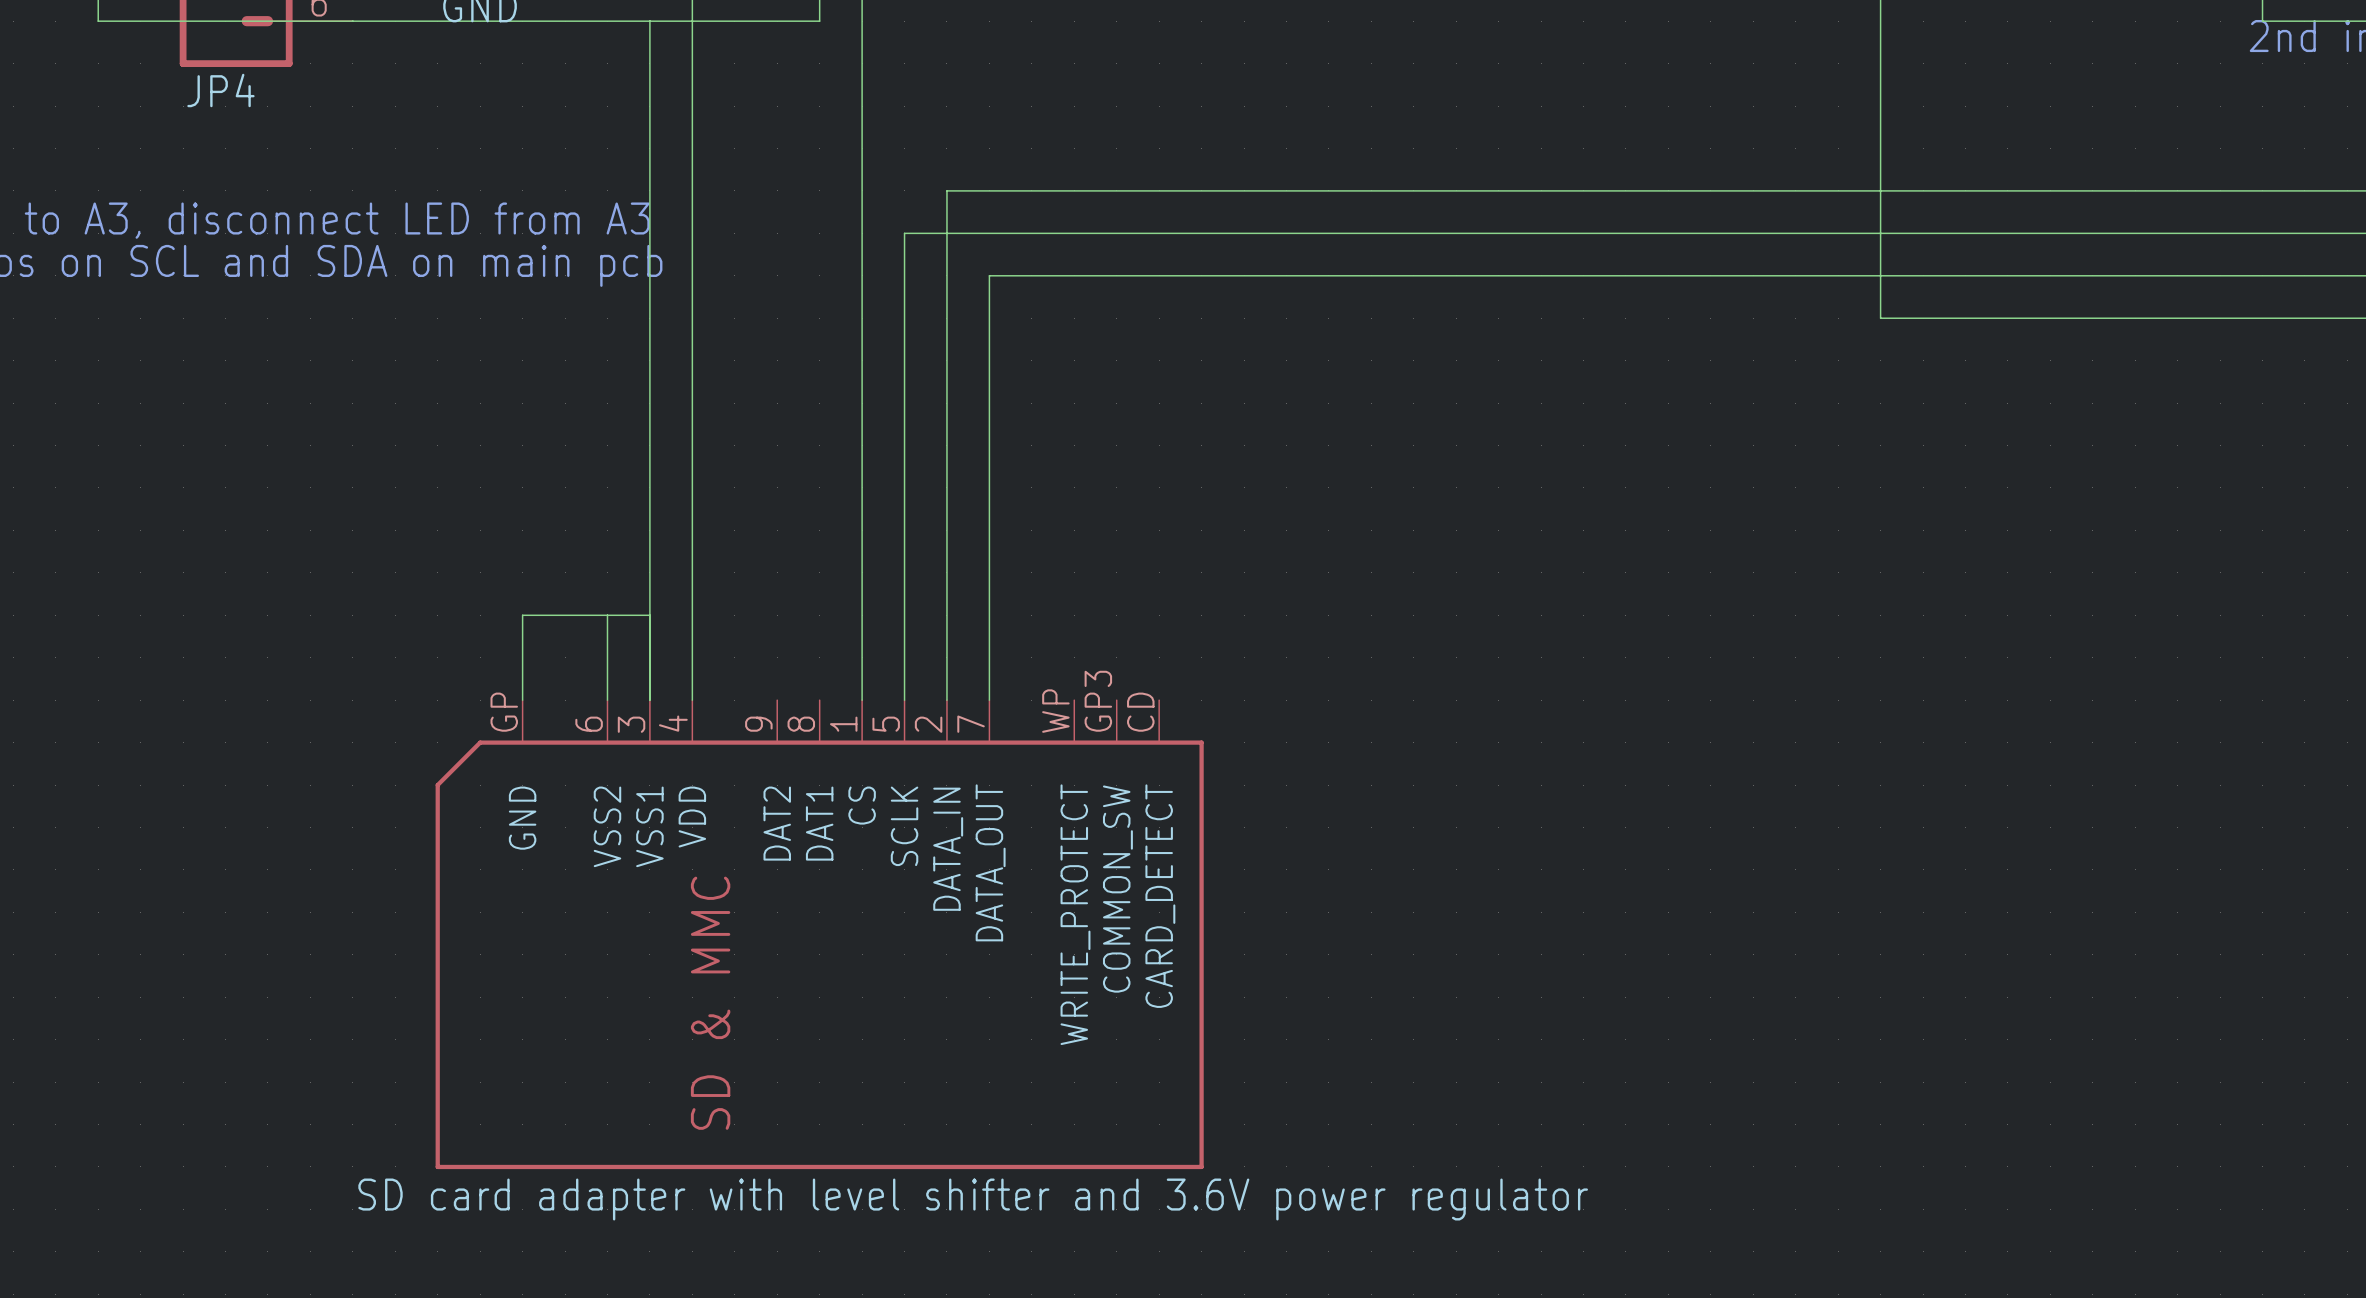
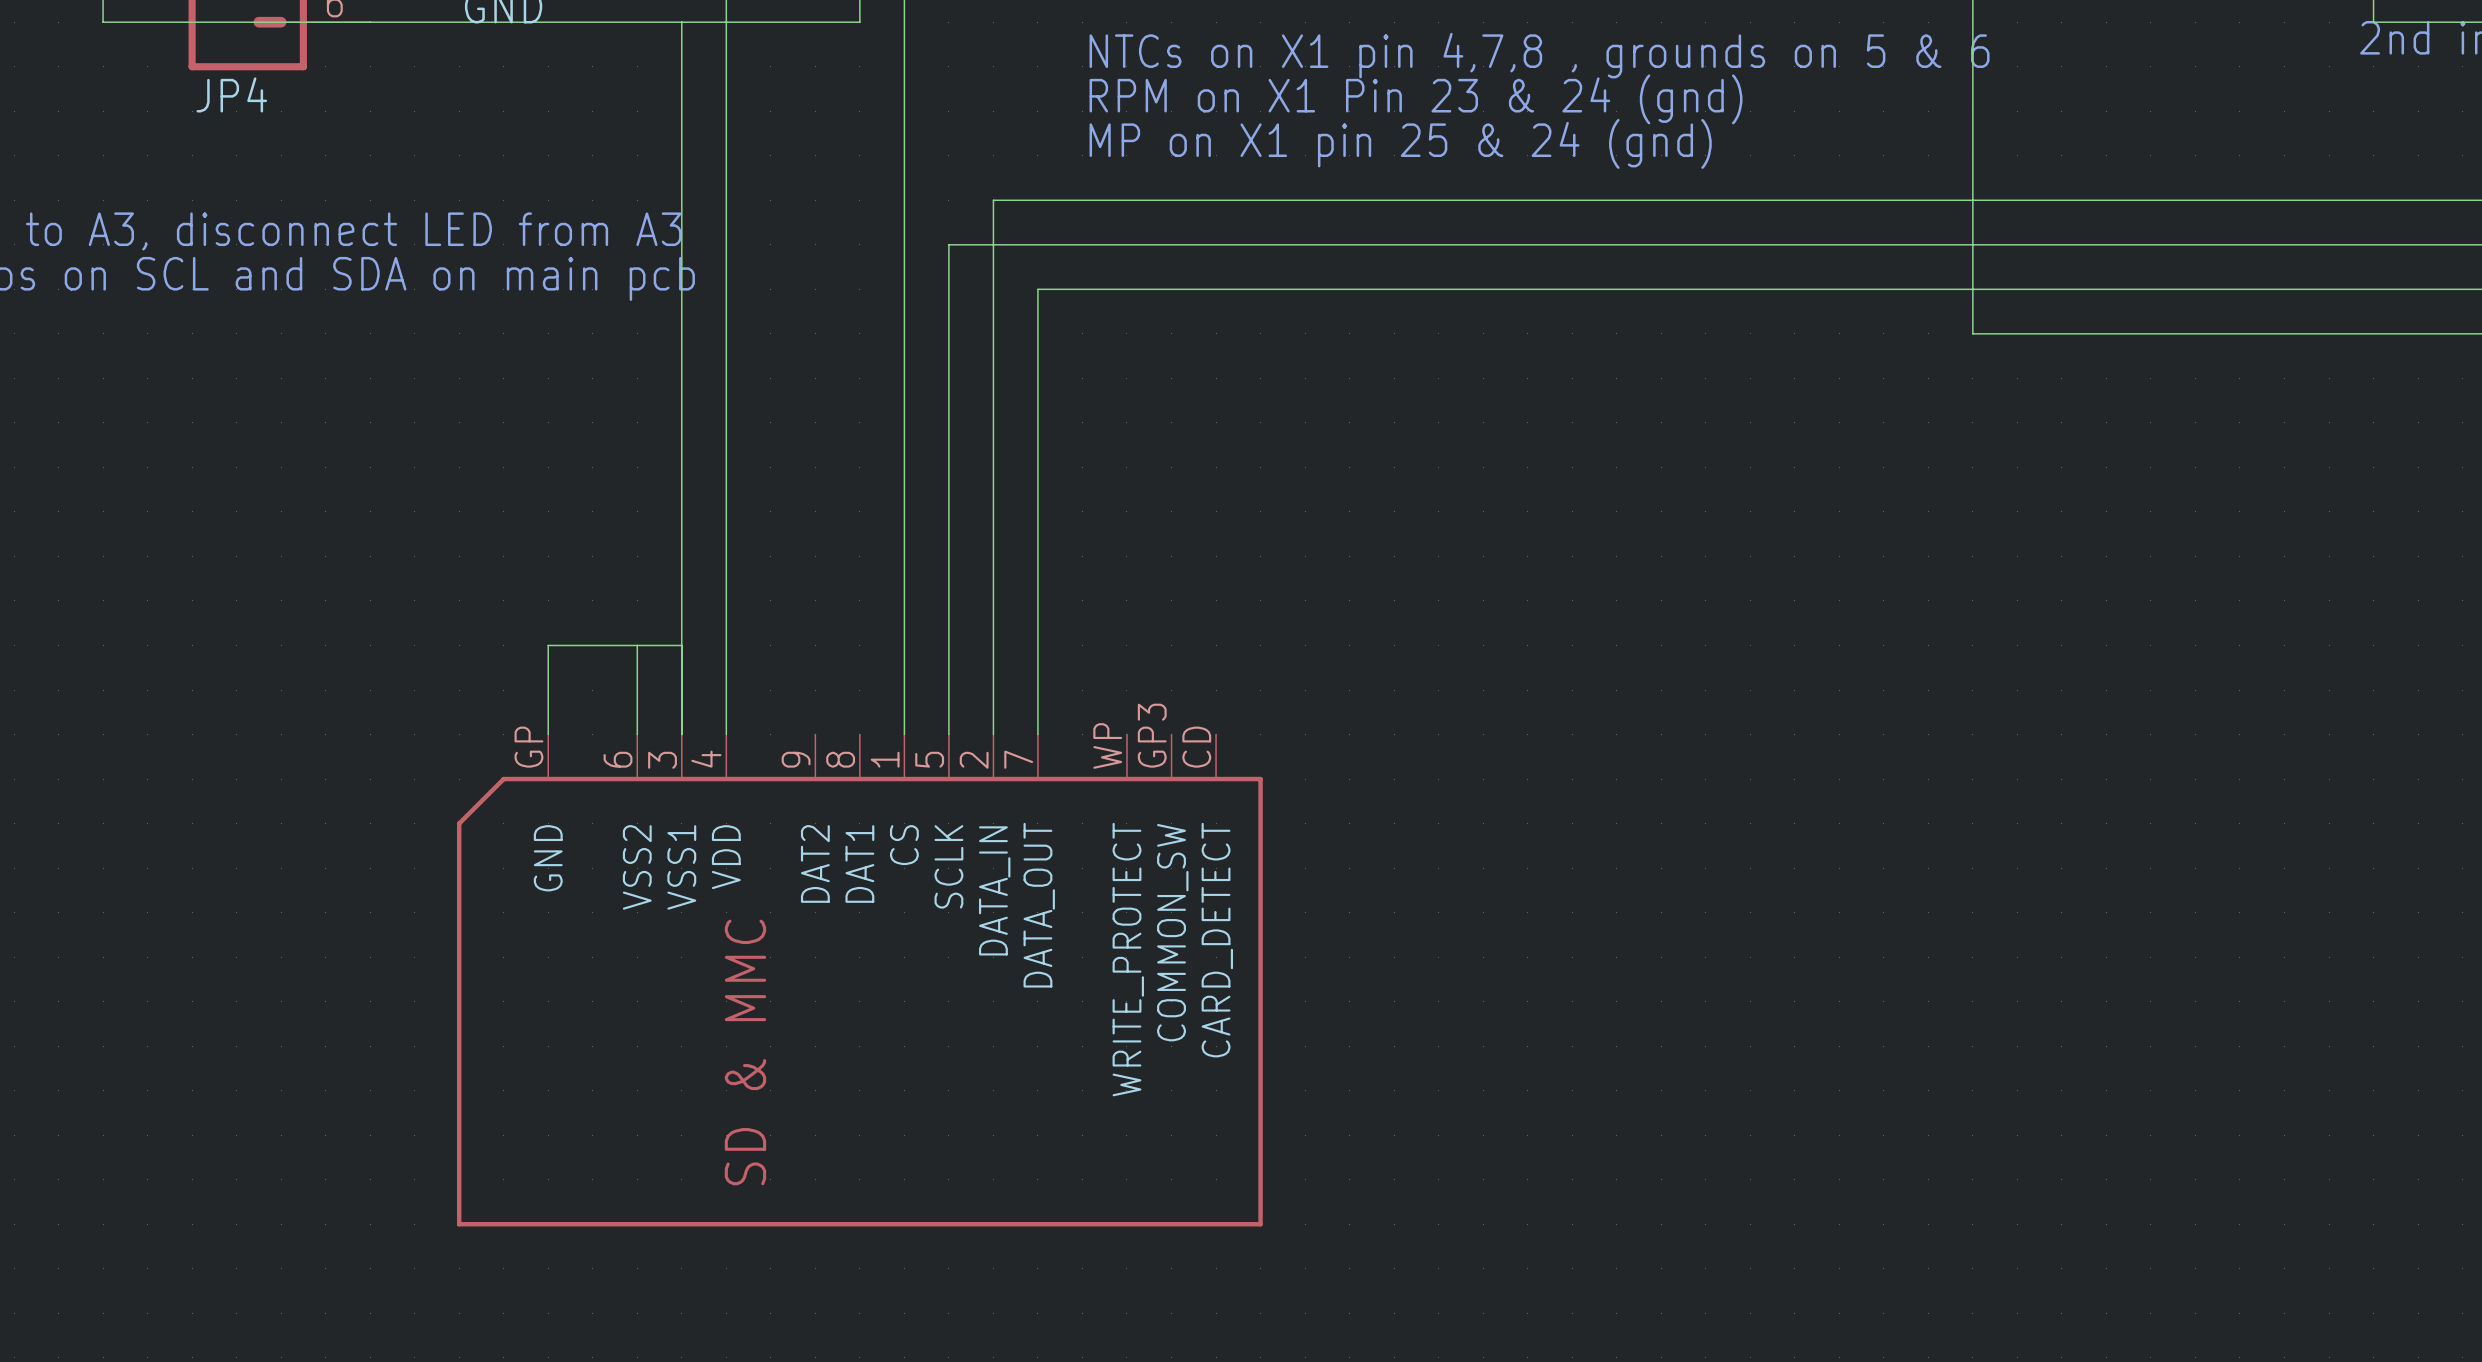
text: none -> NTCs on X1 pin 4,7,8 , grounds on 5 & 6 (1539, 55)
text: none -> RPM on X1 Pin 23 & 24 (gnd) (1416, 99)
text: none -> MP on X1 pin 25 & 24 (gnd) (1400, 143)
text: SD card adapter with level shifter and 3.6V power regulator (973, 1199) -> none

